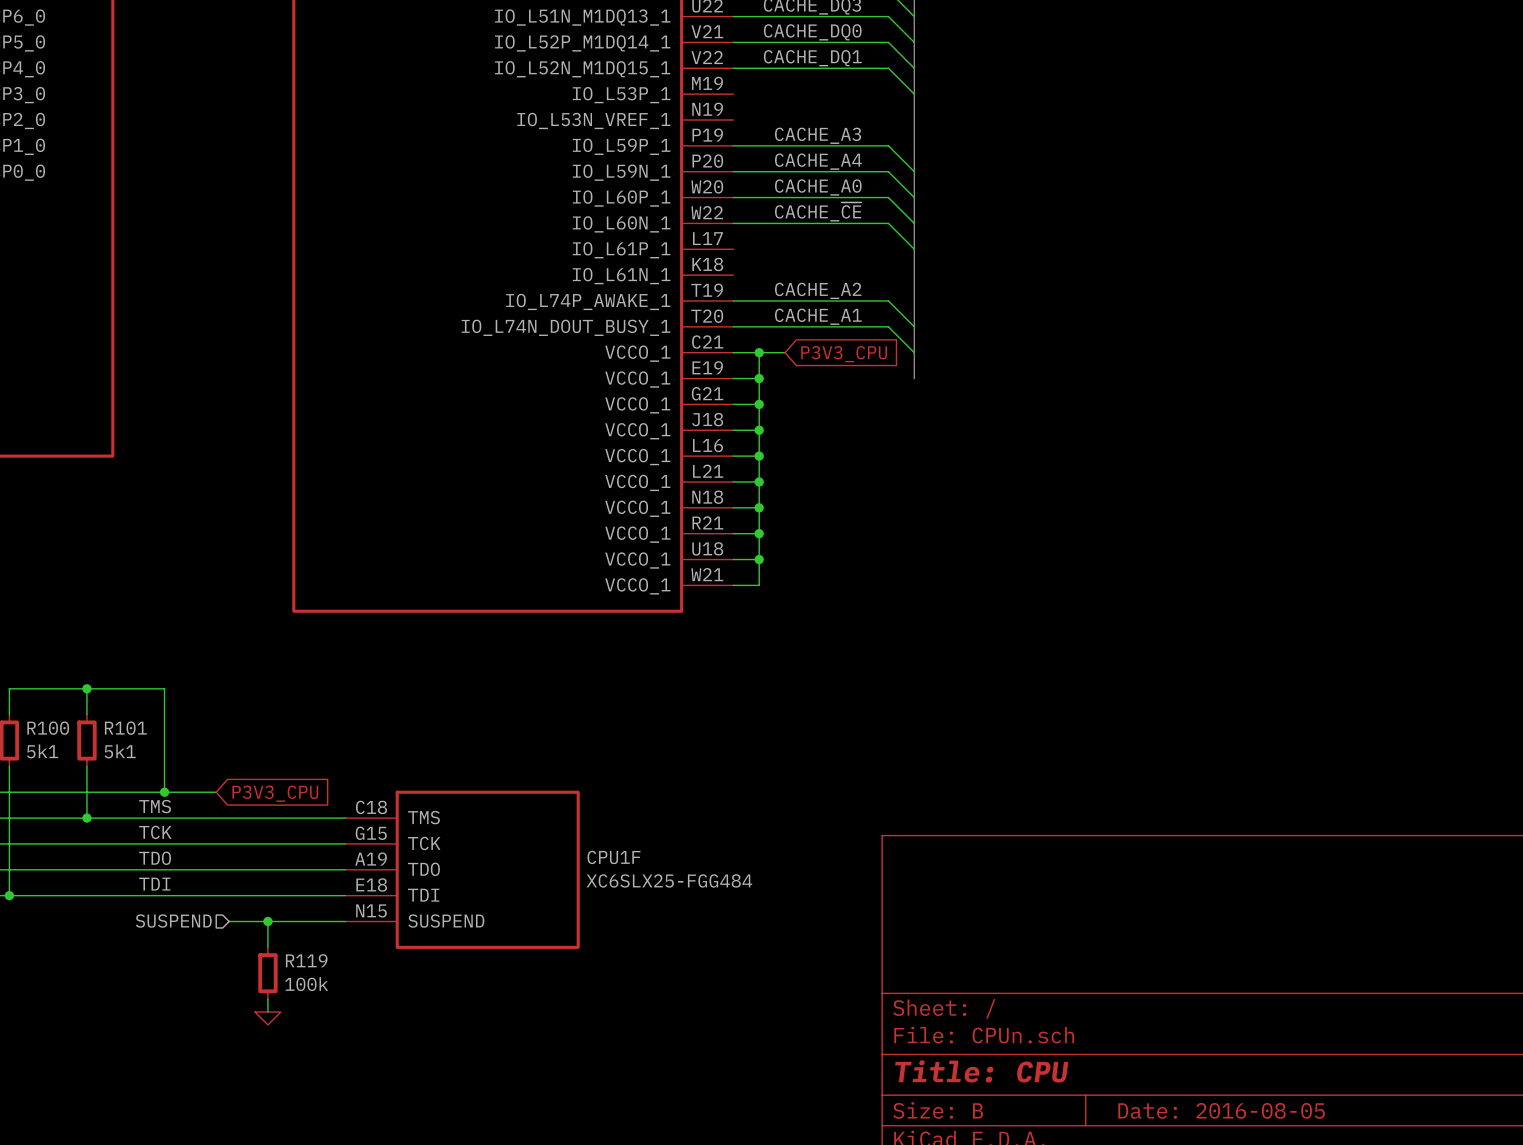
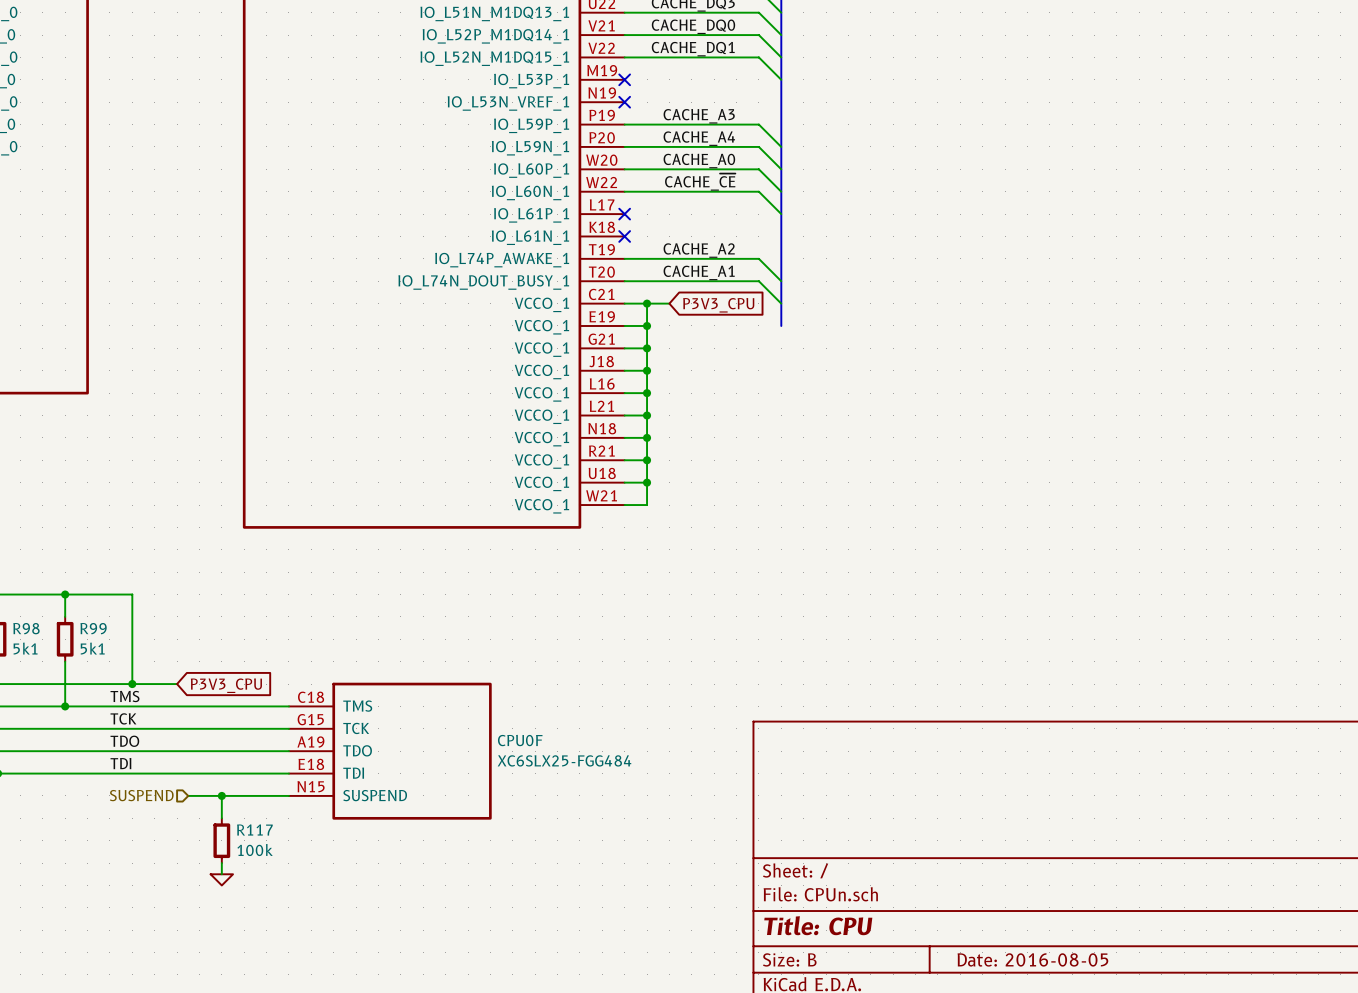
no-connect mark: none -> (624, 79)
no-connect mark: none -> (624, 102)
no-connect mark: none -> (624, 214)
no-connect mark: none -> (624, 236)
R100 name: R100 (48, 728) -> R98 (26, 628)
R101 name: R101 (125, 728) -> R99 (93, 628)
CPU1F name: CPU1F (614, 857) -> CPU0F (520, 740)
R119 name: R119 (306, 960) -> R117 (254, 829)

